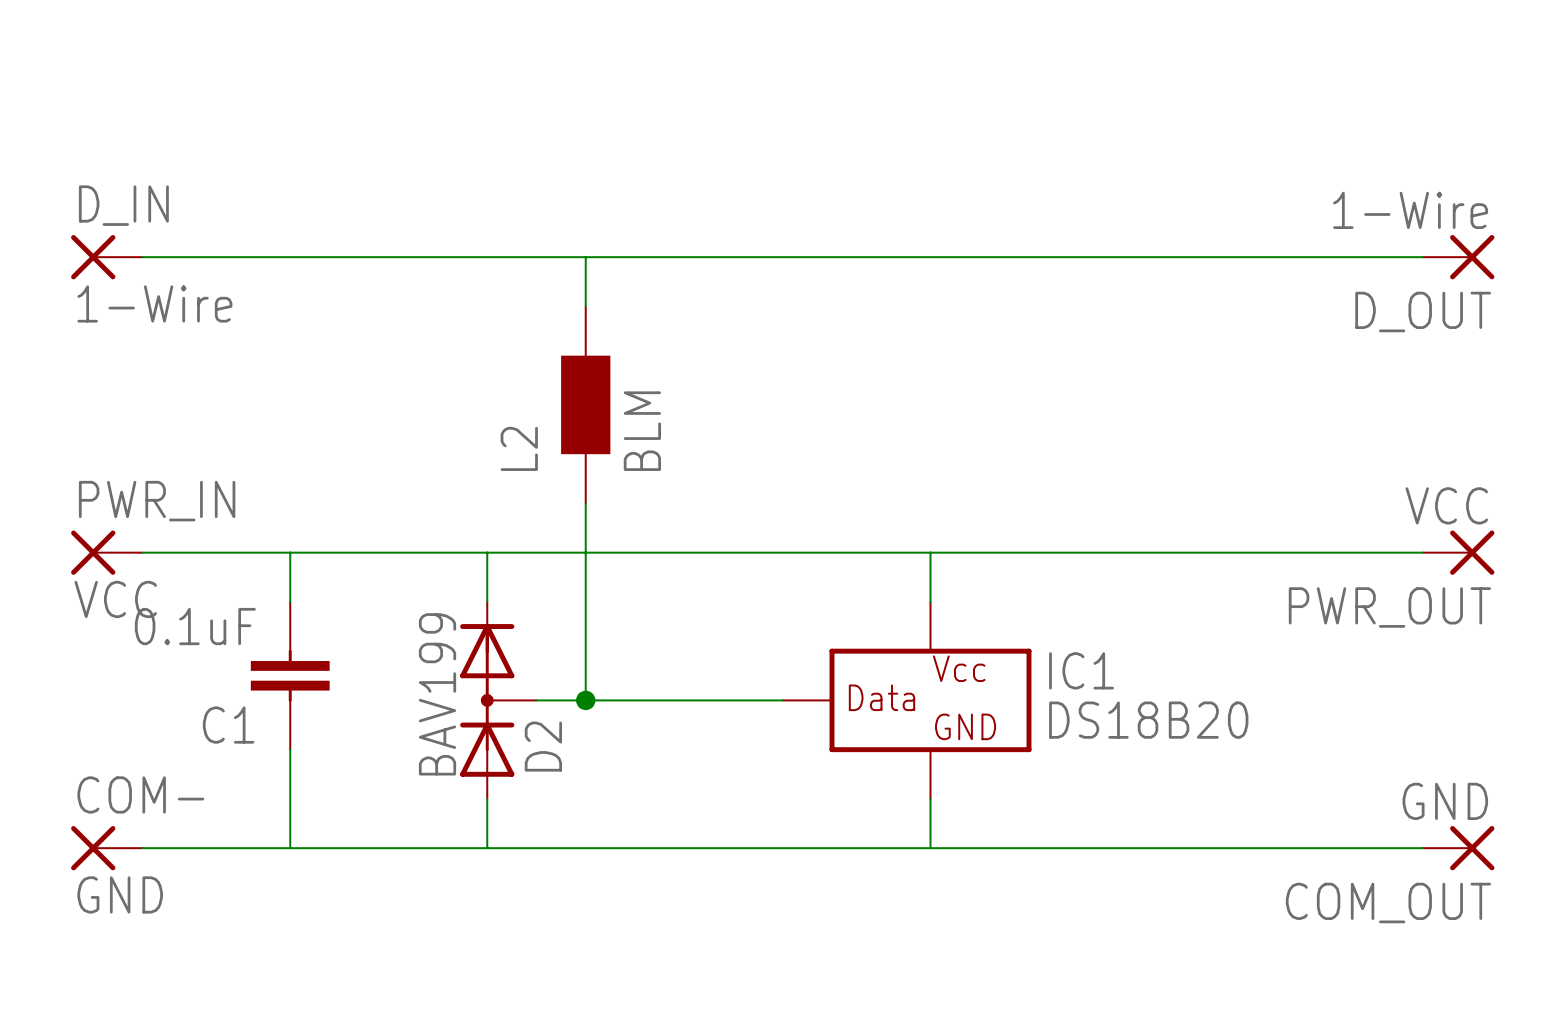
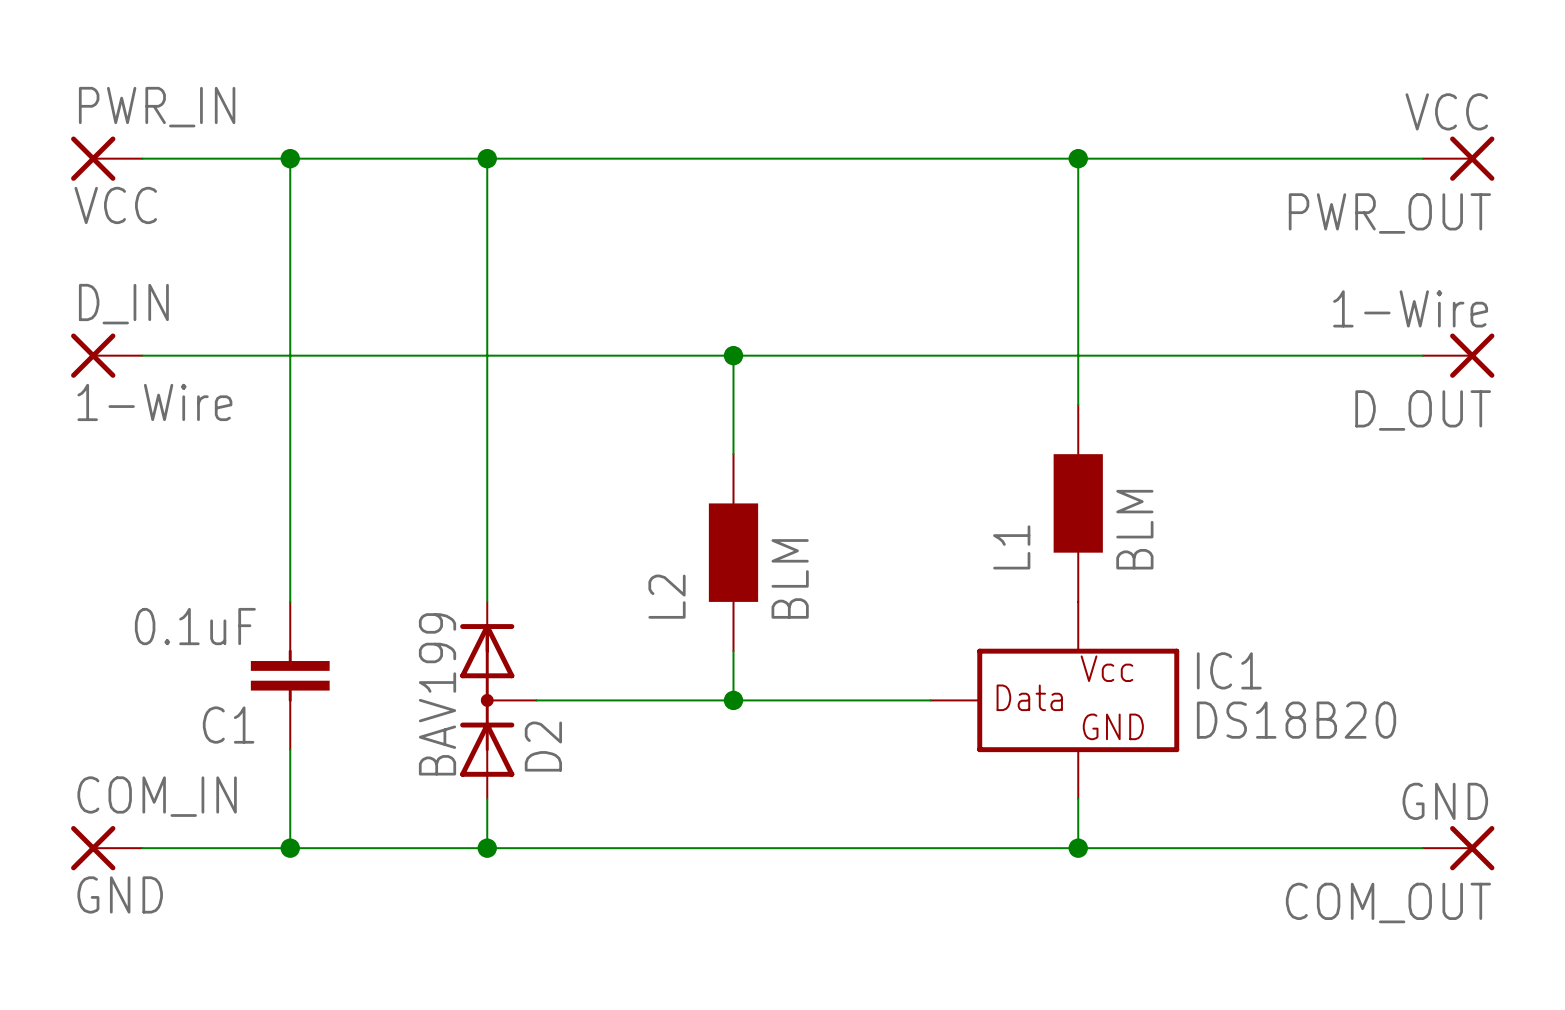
wire: none -> (290, 158) (290, 552)
junction: none -> (290, 158)
wire: none -> (487, 158) (487, 552)
junction: none -> (487, 158)
wire: none -> (1078, 158) (1078, 404)
junction: none -> (1078, 158)
D_IN position: (106, 257) -> (106, 355)
wire: (142, 257) (1422, 257) -> (142, 158) (1422, 158)
wire: (585, 257) (585, 306) -> none
D_OUT position: (1458, 257) -> (1458, 355)
wire: none -> (733, 355) (733, 454)
junction: none -> (733, 355)
L2 position: (585, 404) -> (733, 552)
wire: (585, 503) (585, 700) -> none
L1: none -> BLM (1078, 503)
PWR_IN position: (106, 552) -> (106, 158)
wire: (142, 552) (1422, 552) -> (142, 355) (1422, 355)
wire: (930, 552) (930, 601) -> (733, 651) (733, 700)
PWR_OUT position: (1458, 552) -> (1458, 158)
junction: (585, 700) -> none
junction: none -> (733, 700)
wire: none -> (782, 700) (930, 700)
IC1 position: (907, 700) -> (1054, 700)
COM- name: COM- (140, 794) -> COM_IN (157, 796)
wire: (930, 798) (930, 848) -> (1078, 798) (1078, 848)
junction: none -> (290, 848)
junction: none -> (487, 848)
junction: none -> (1078, 848)

